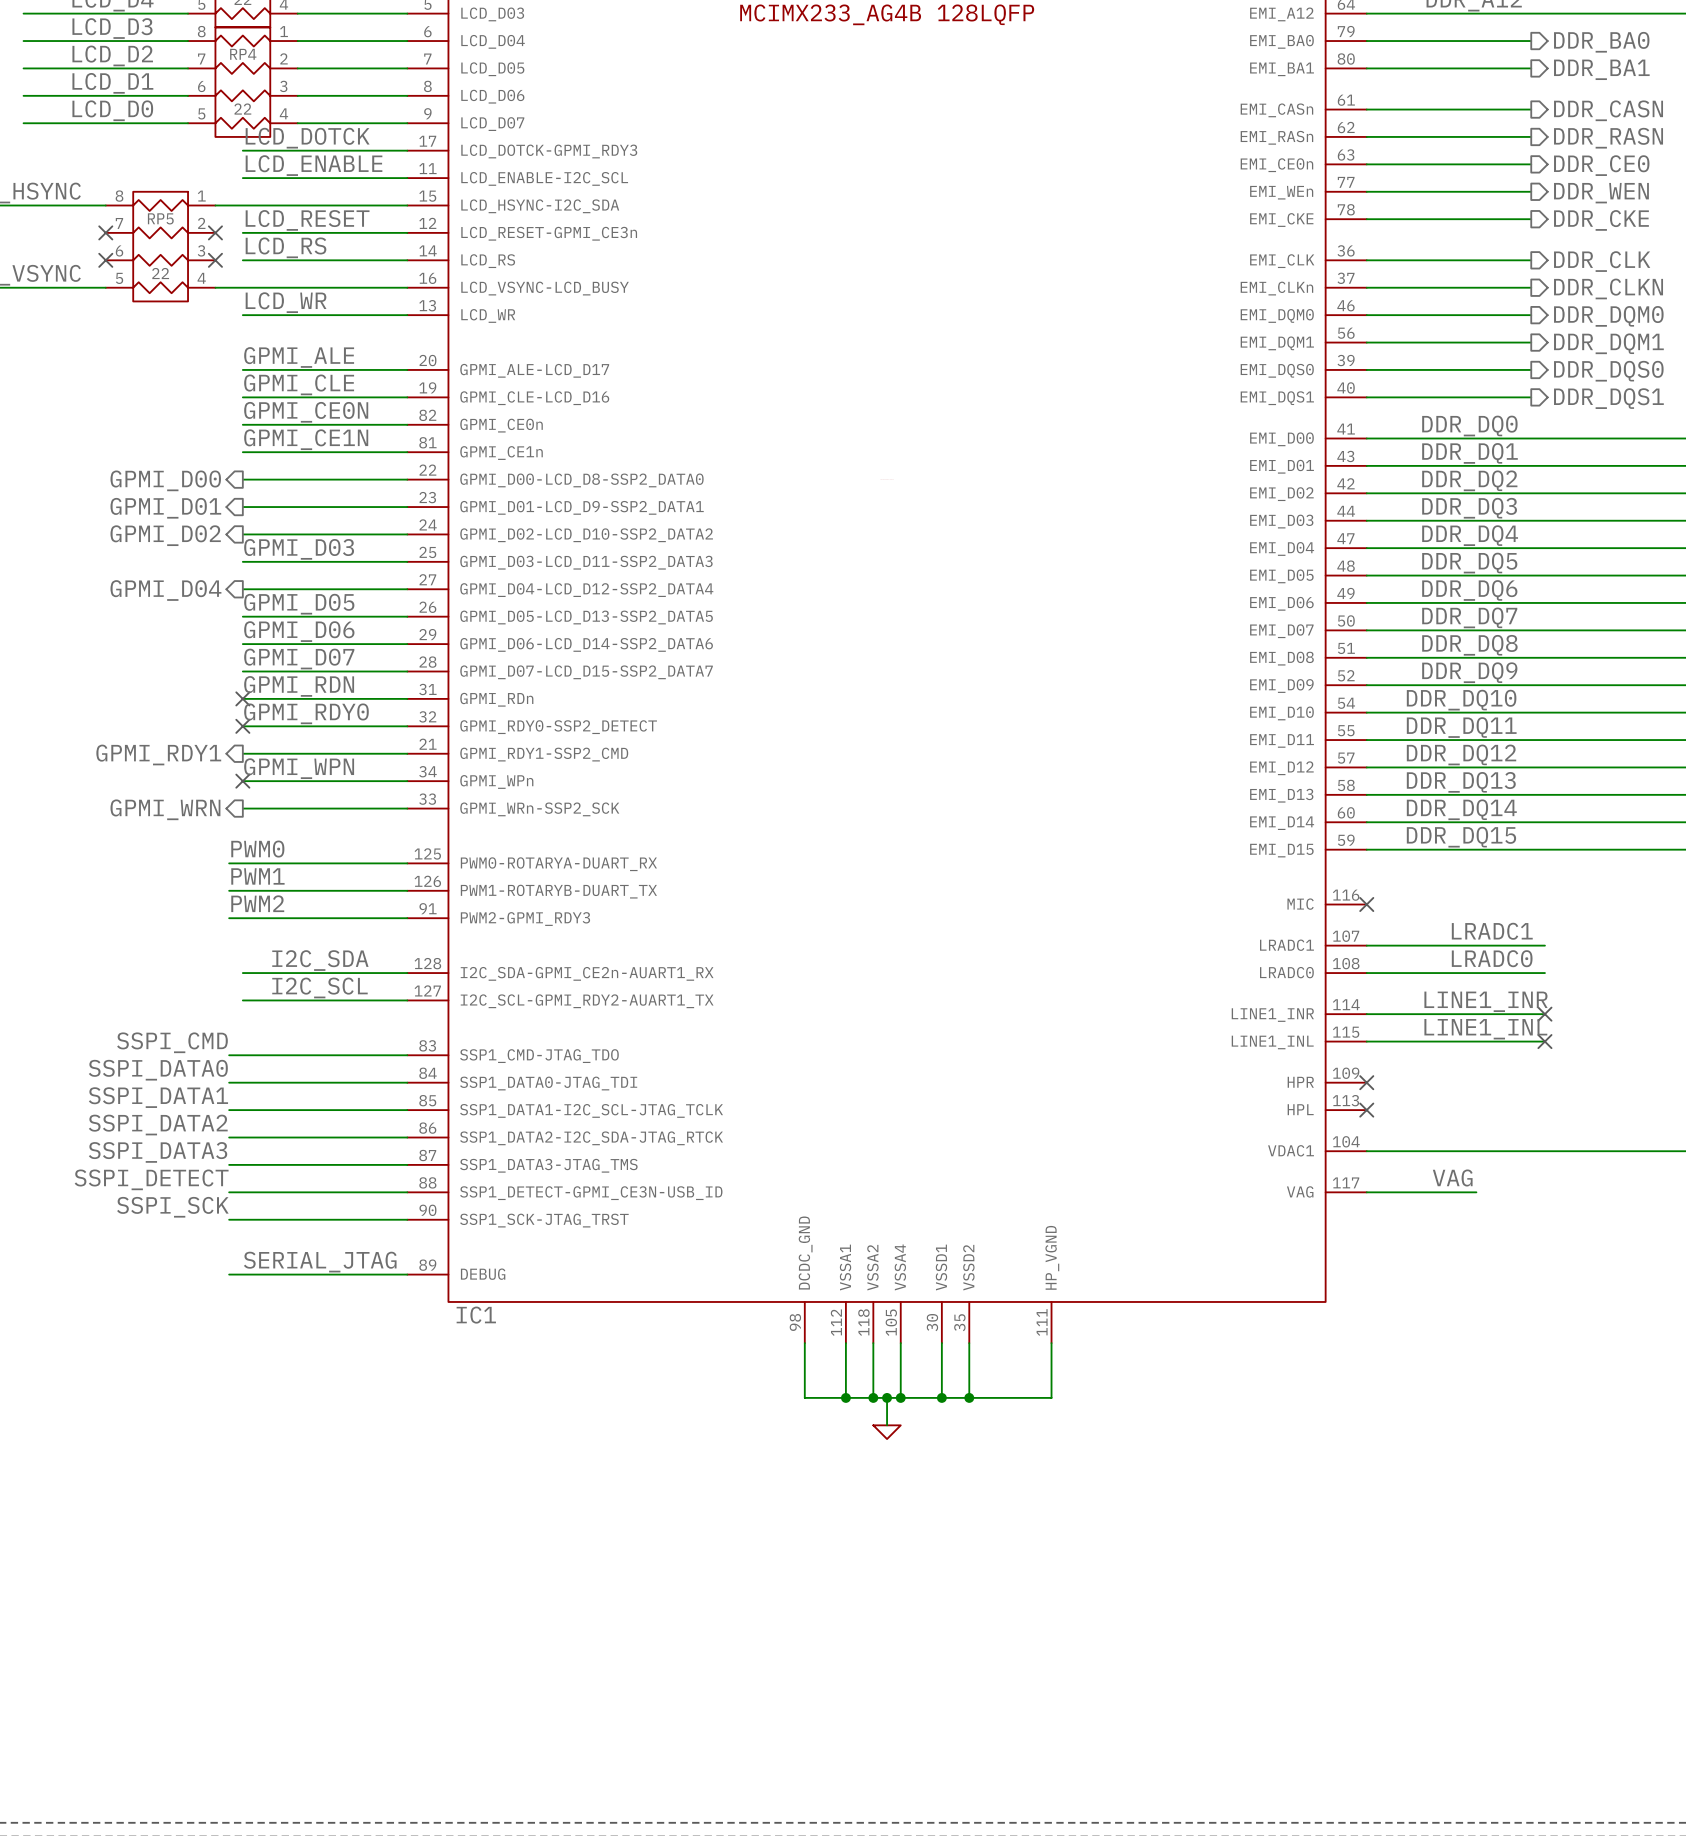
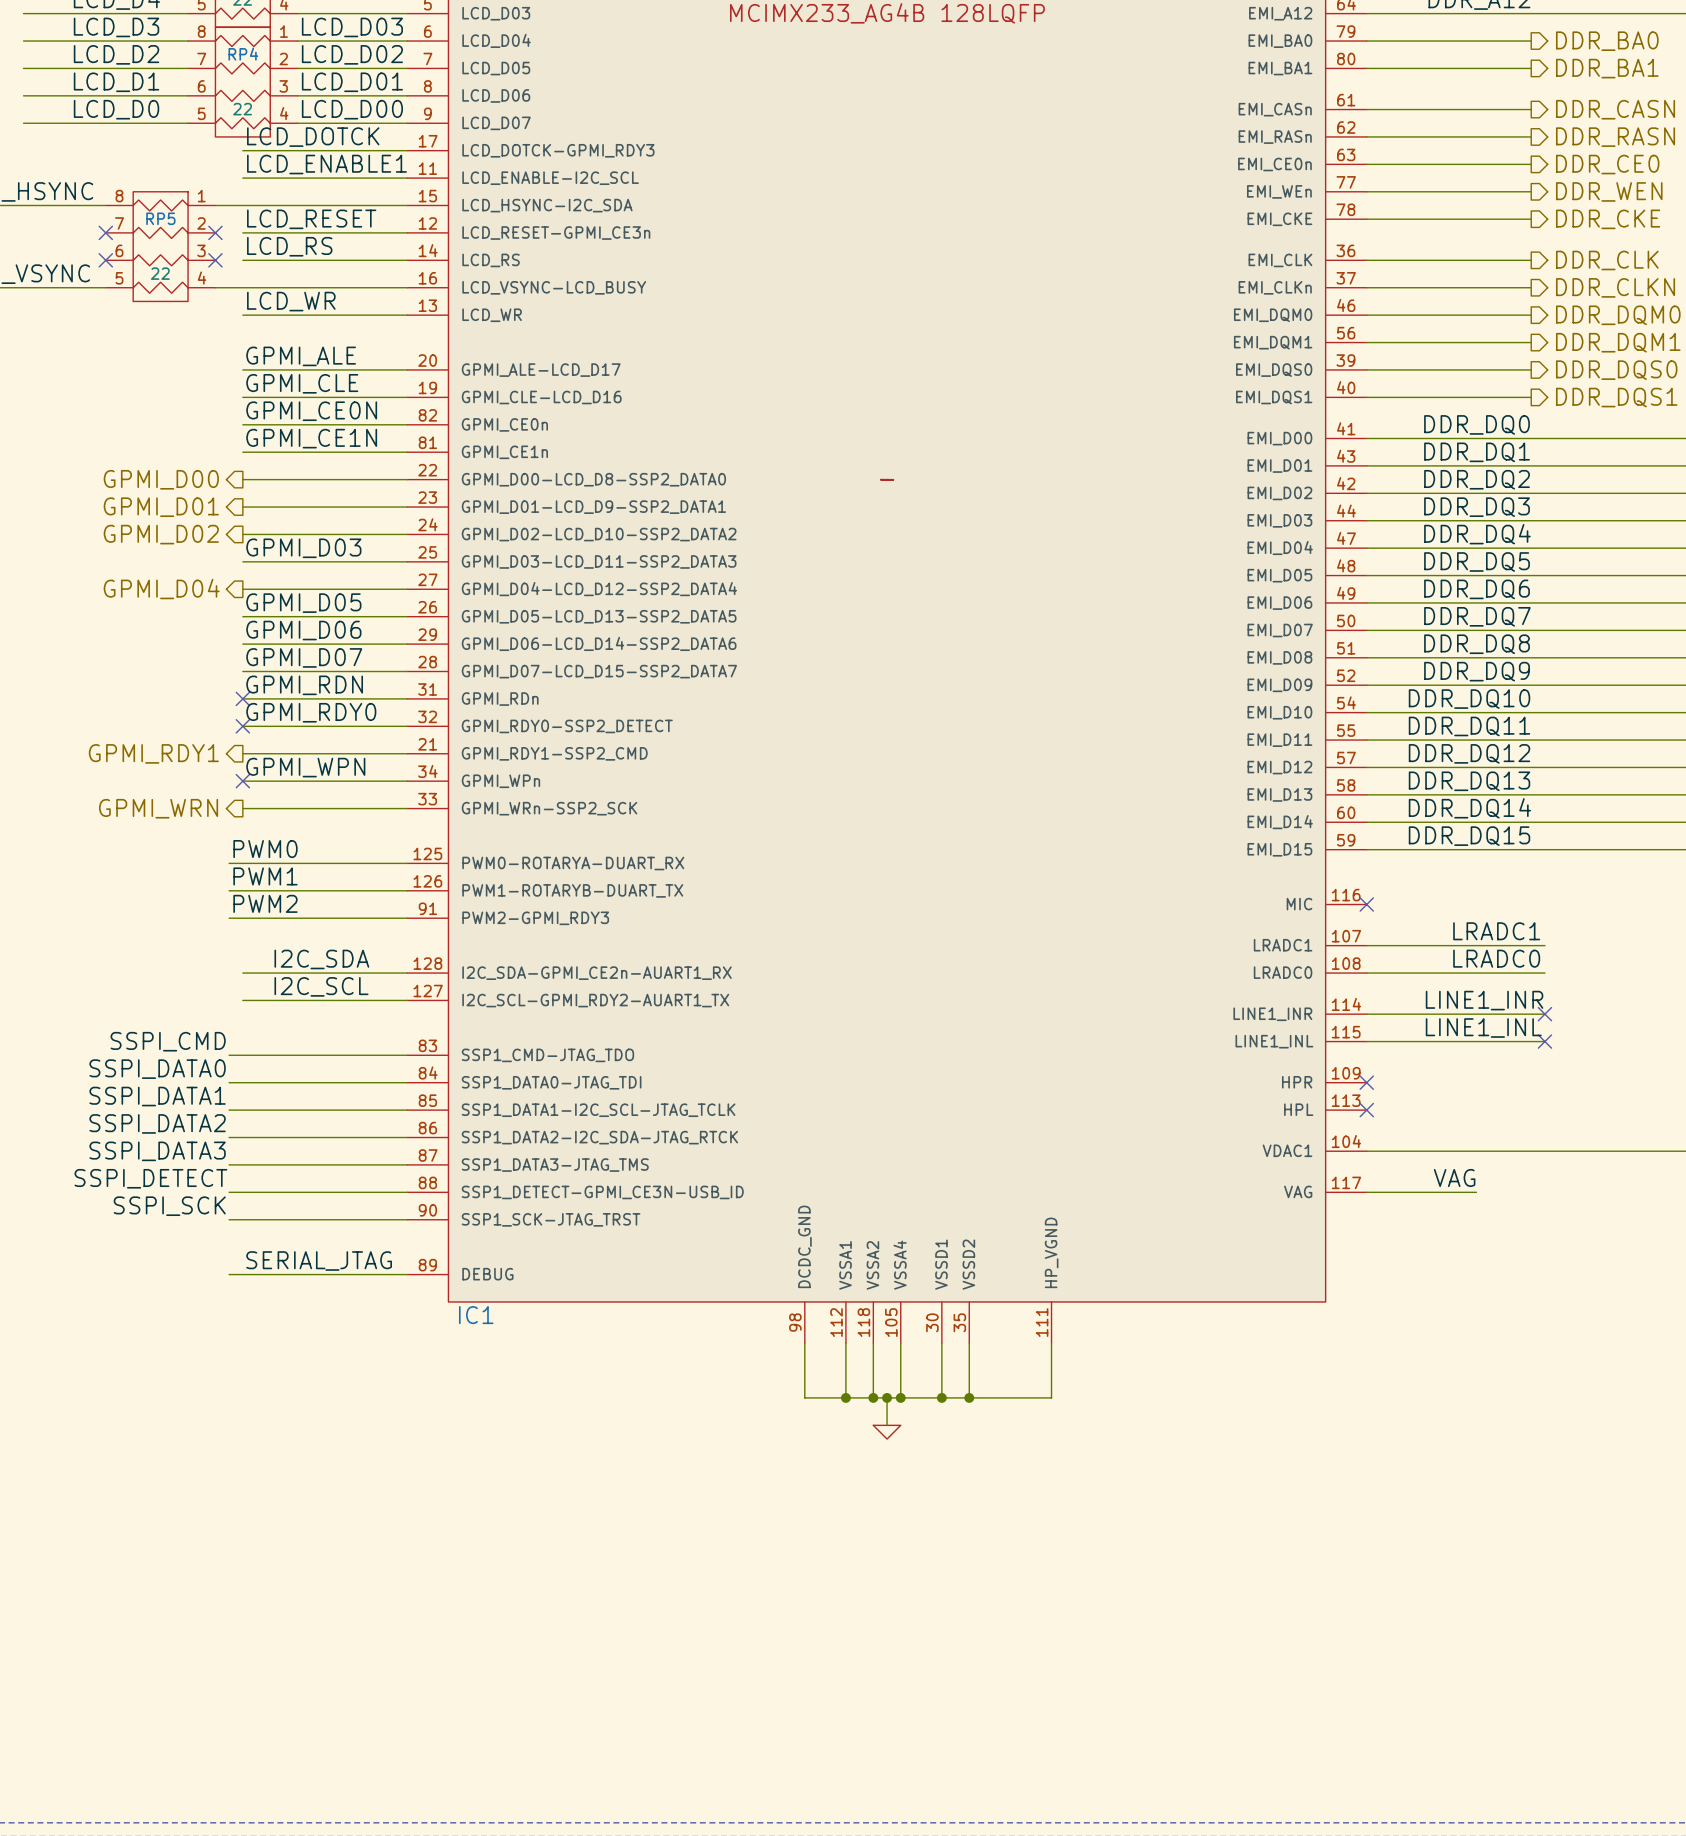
label: none -> LCD_D03 (352, 27)
label: none -> LCD_D02 (352, 54)
label: none -> LCD_D01 (352, 82)
label: none -> LCD_D00 (352, 109)
label: LCD_ENABLE (314, 165) -> LCD_ENABLE1 (326, 164)

